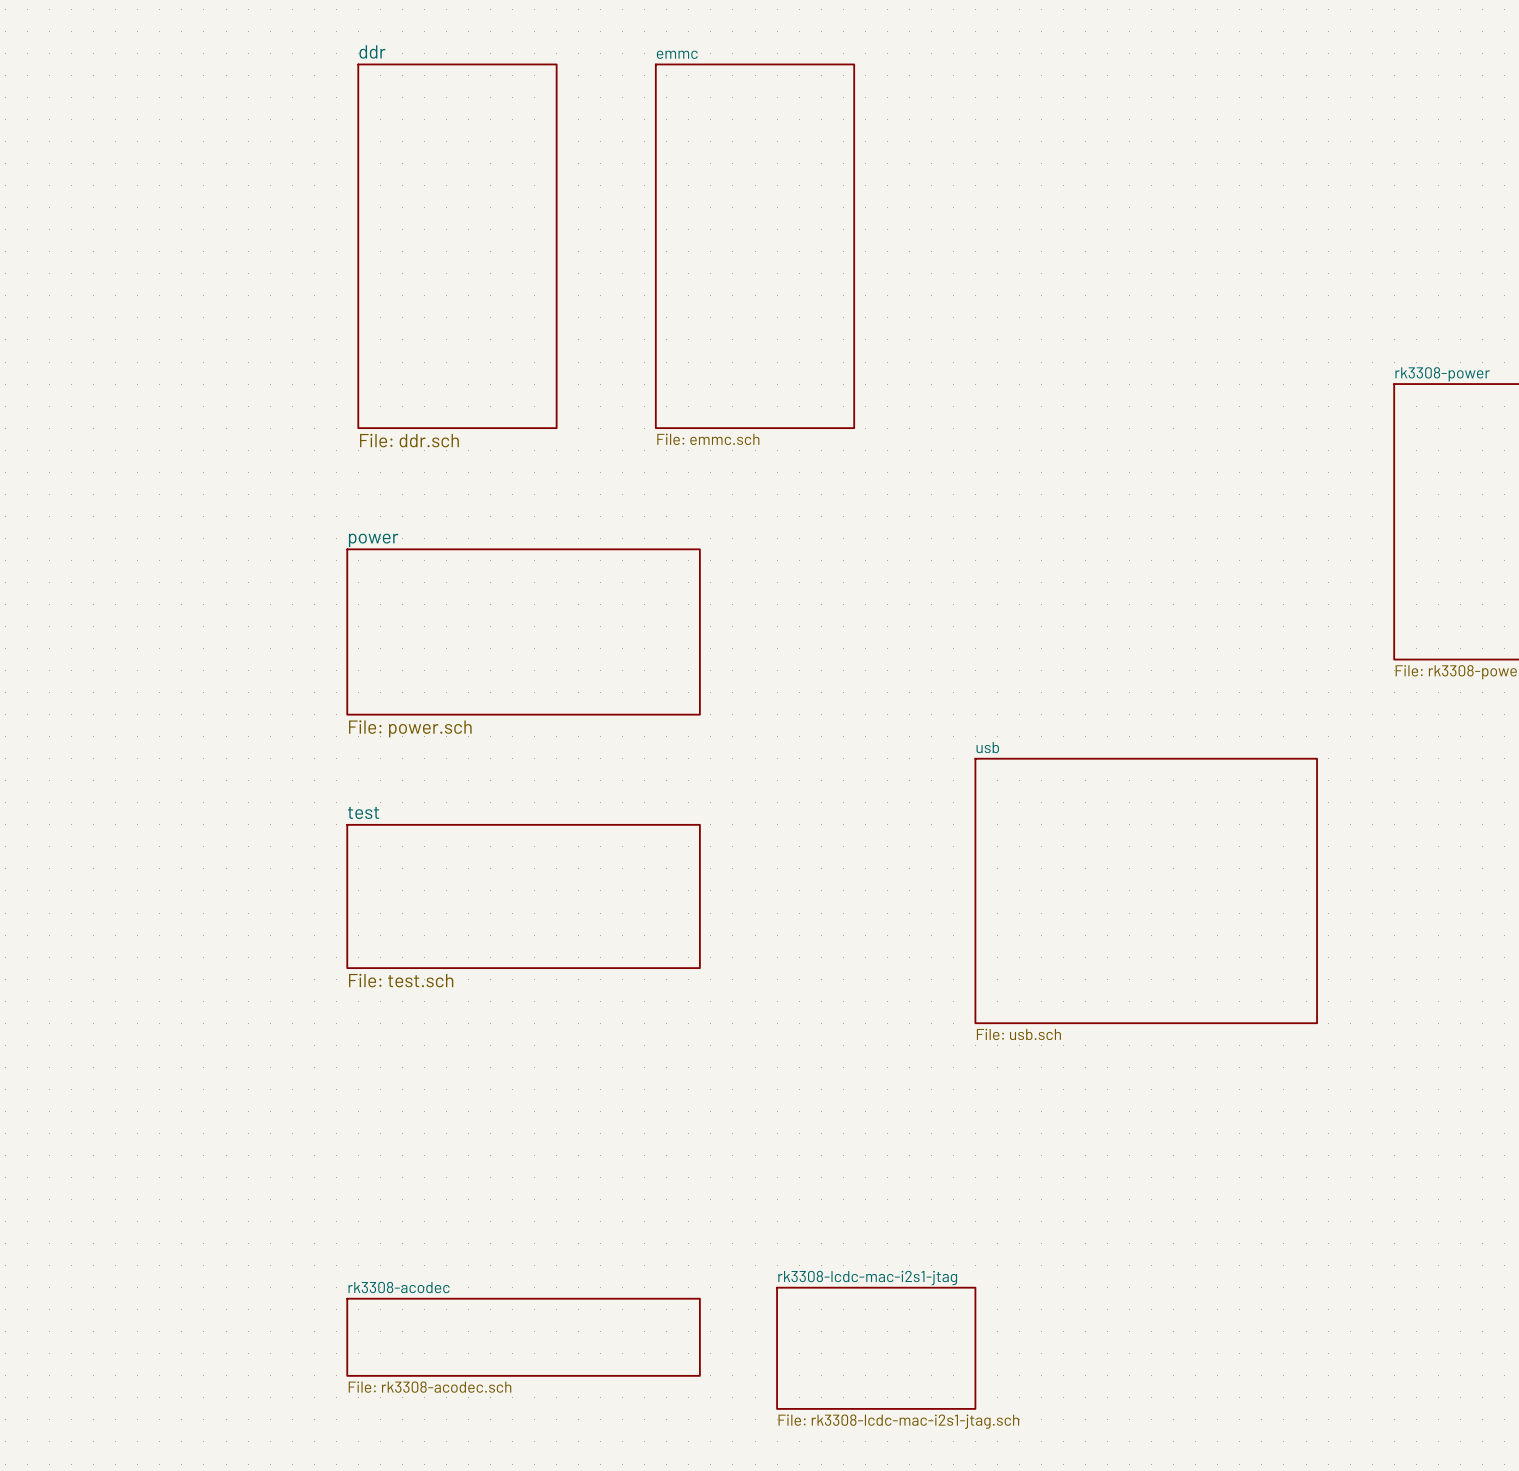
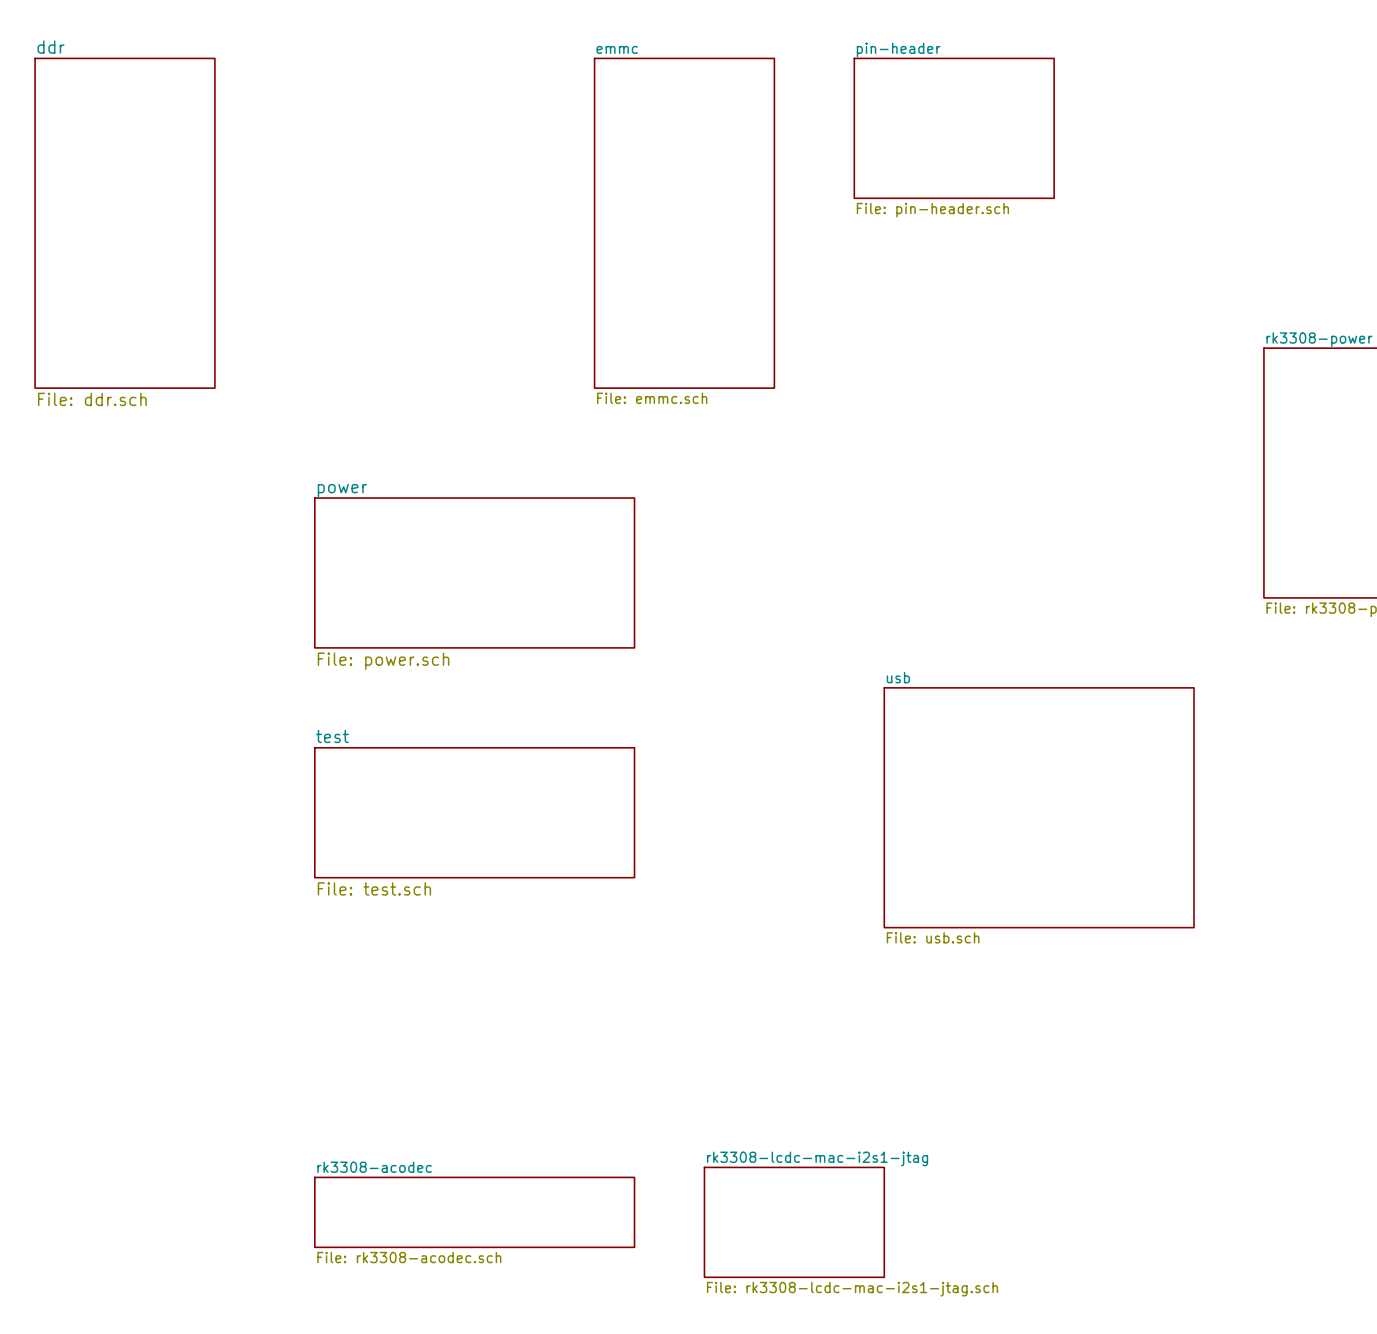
sheet pin-header: none -> File: pin-header.sch (954, 128)
sheet ddr: none -> File: ddr.sch (124, 223)
sheet ddr: File: ddr.sch (457, 246) -> none

